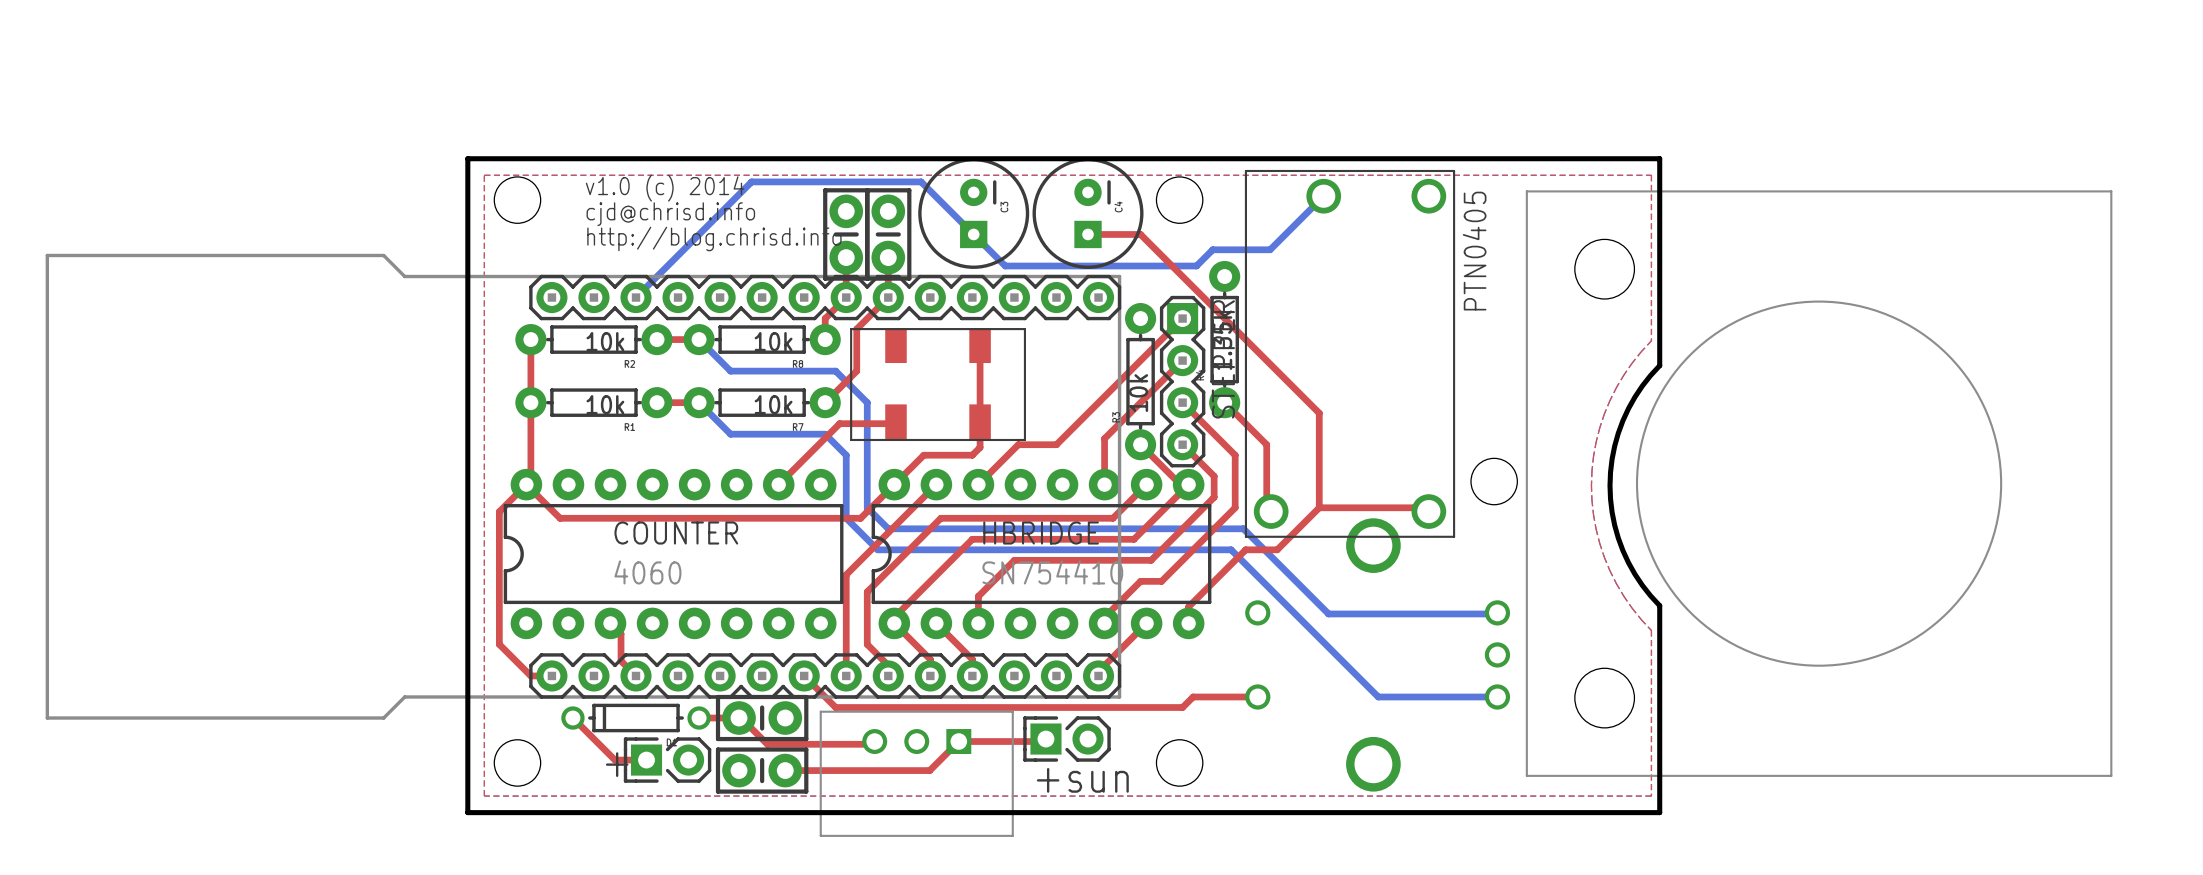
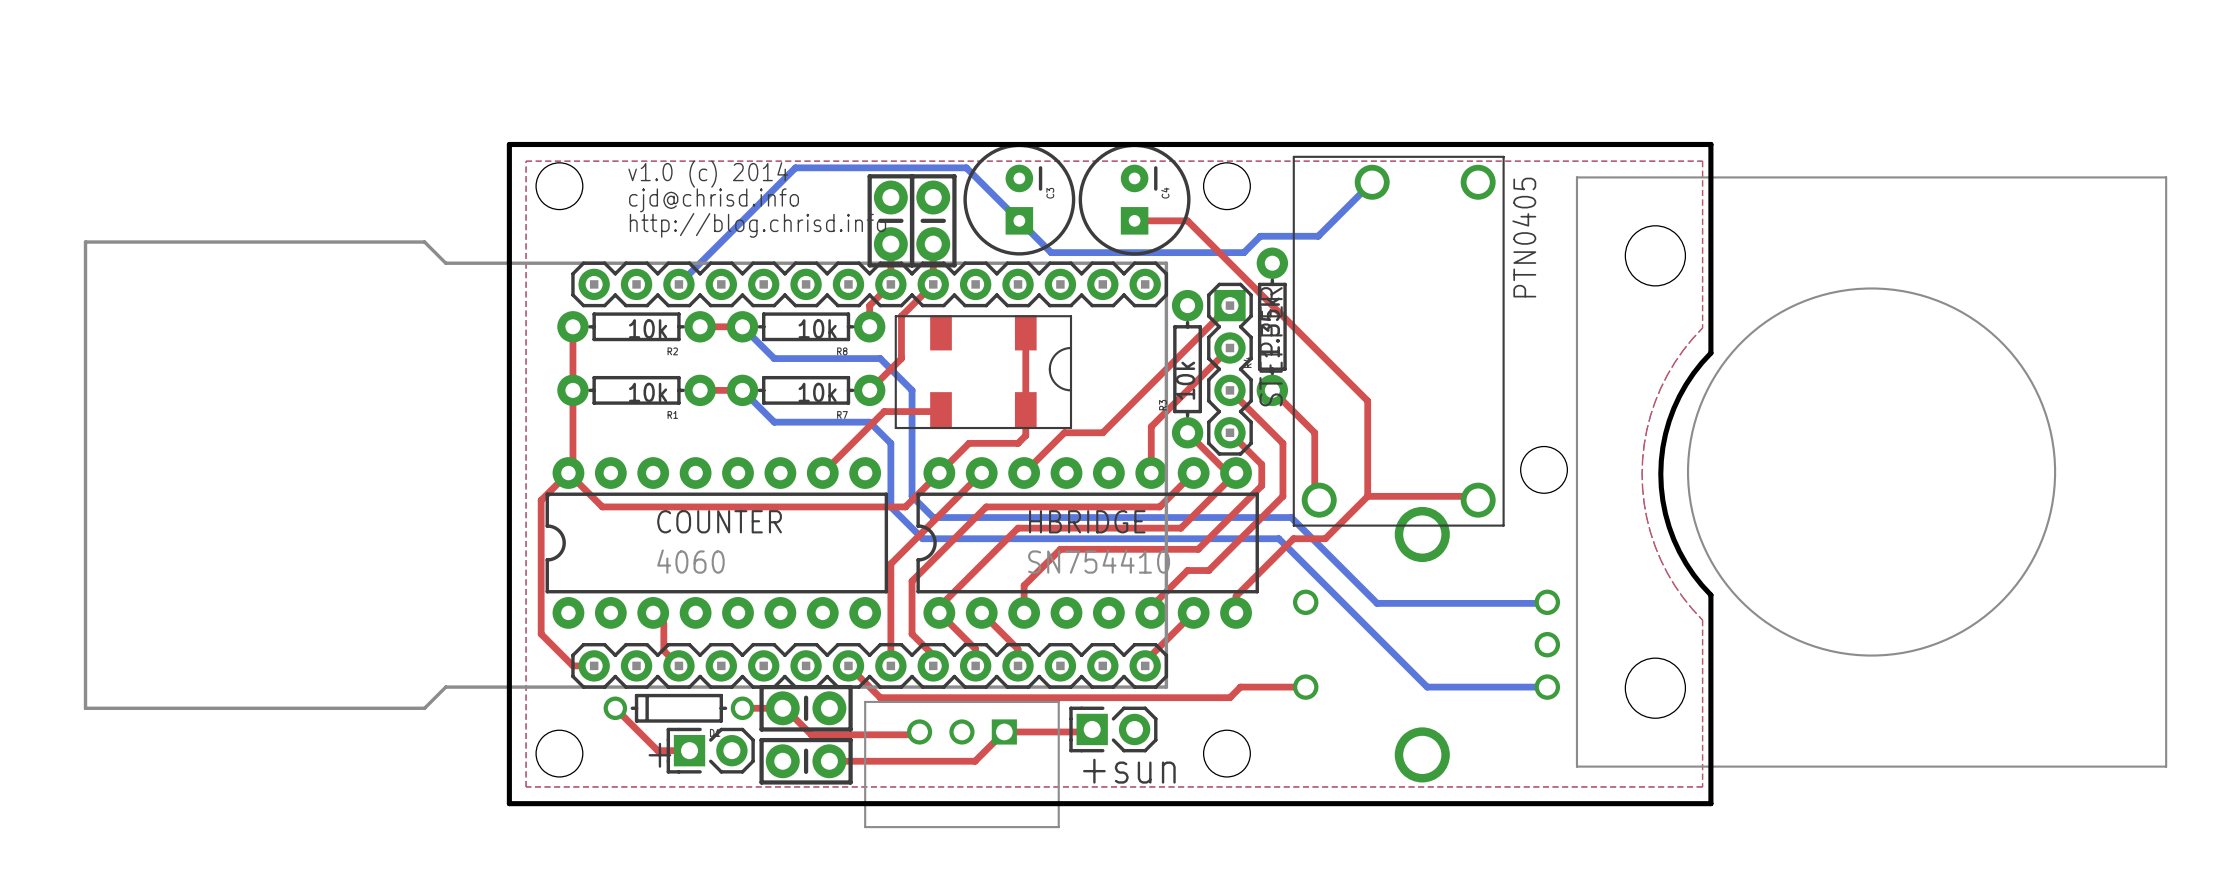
part footprint: [850, 328, 1026, 442] -> [894, 315, 1073, 430]

